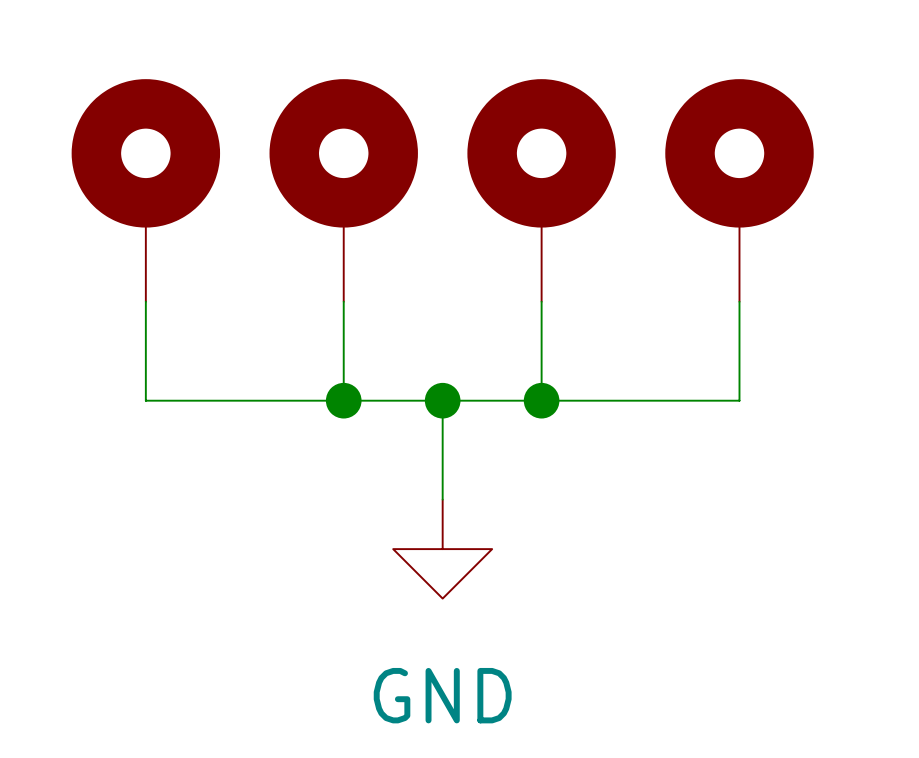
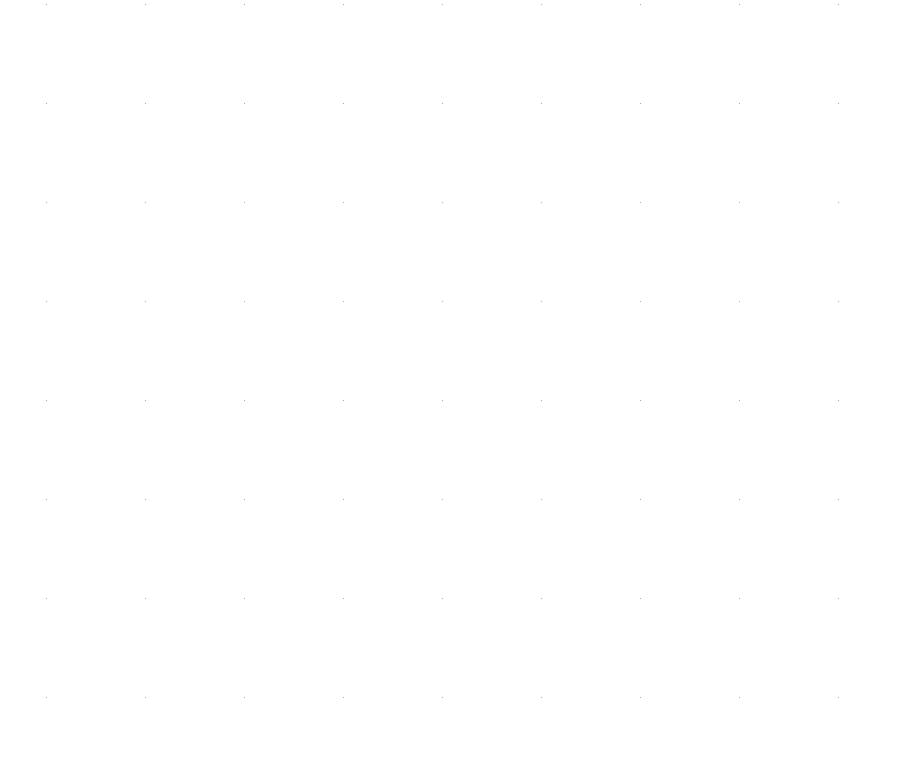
part: (145, 190) -> none
part: (343, 190) -> none
part: (541, 190) -> none
part: (739, 190) -> none
wire: (145, 301) (145, 400) (739, 400) (739, 301) -> none
wire: (343, 301) (343, 400) -> none
wire: (541, 301) (541, 400) -> none
junction: (343, 400) -> none
wire: (442, 400) (442, 499) -> none
junction: (442, 400) -> none
junction: (541, 400) -> none
power symbol: GND (442, 549) -> none

